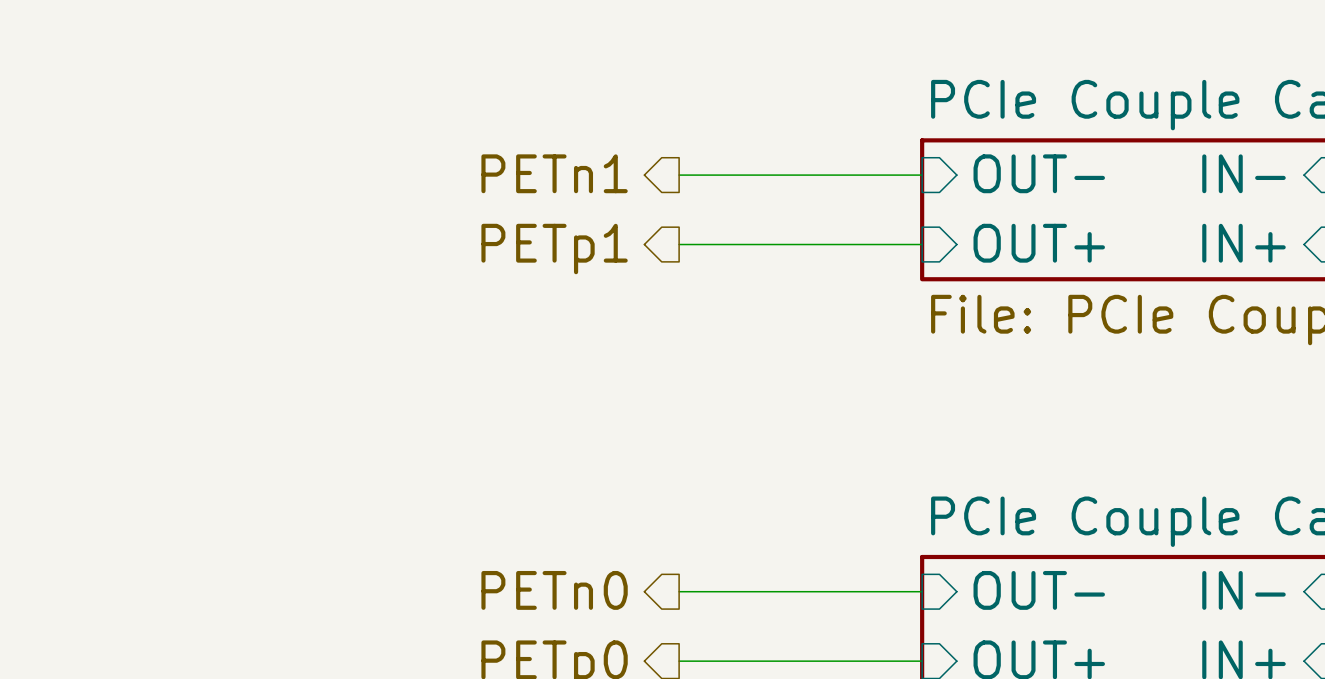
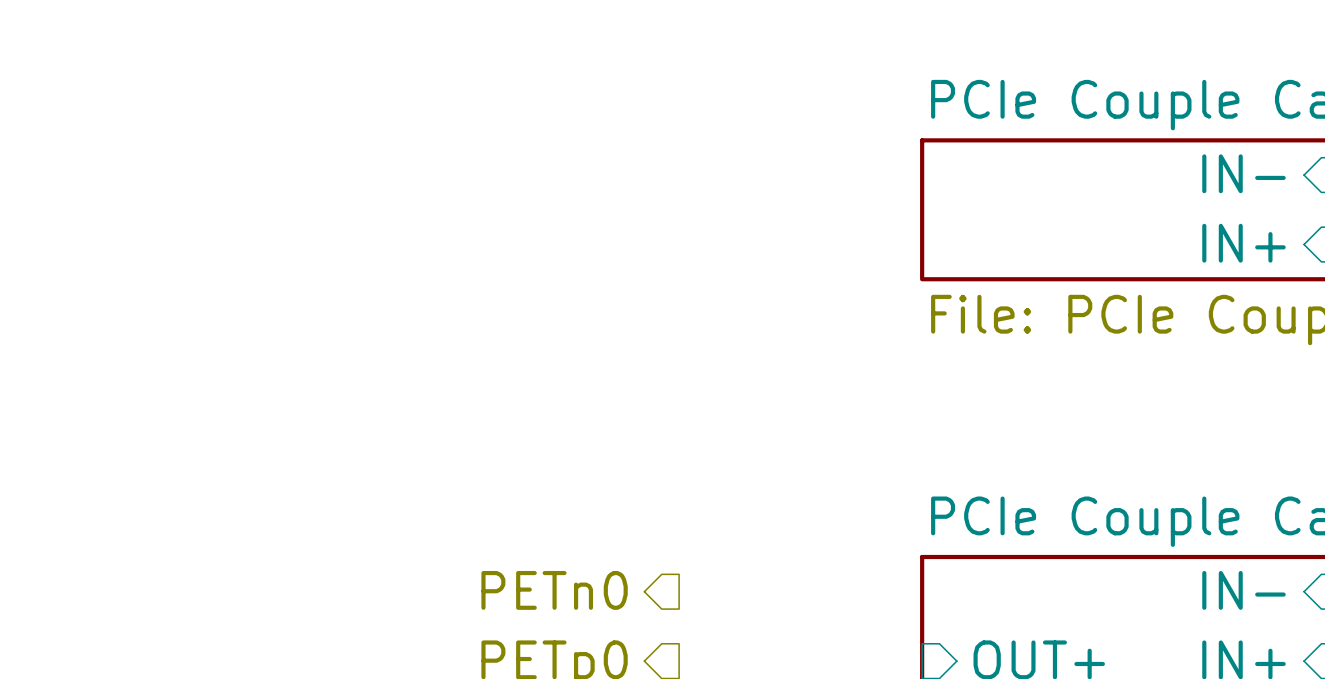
hierarchical label: PETn1 (554, 173) -> none
sheet pin: OUT- (1039, 173) -> none
wire: (679, 175) (922, 175) -> none
sheet pin: OUT+ (1039, 243) -> none
wire: (679, 244) (922, 244) -> none
hierarchical label: PETp1 (554, 249) -> none
sheet pin: OUT- (1039, 590) -> none
wire: (679, 591) (922, 591) -> none
wire: (679, 661) (922, 661) -> none

